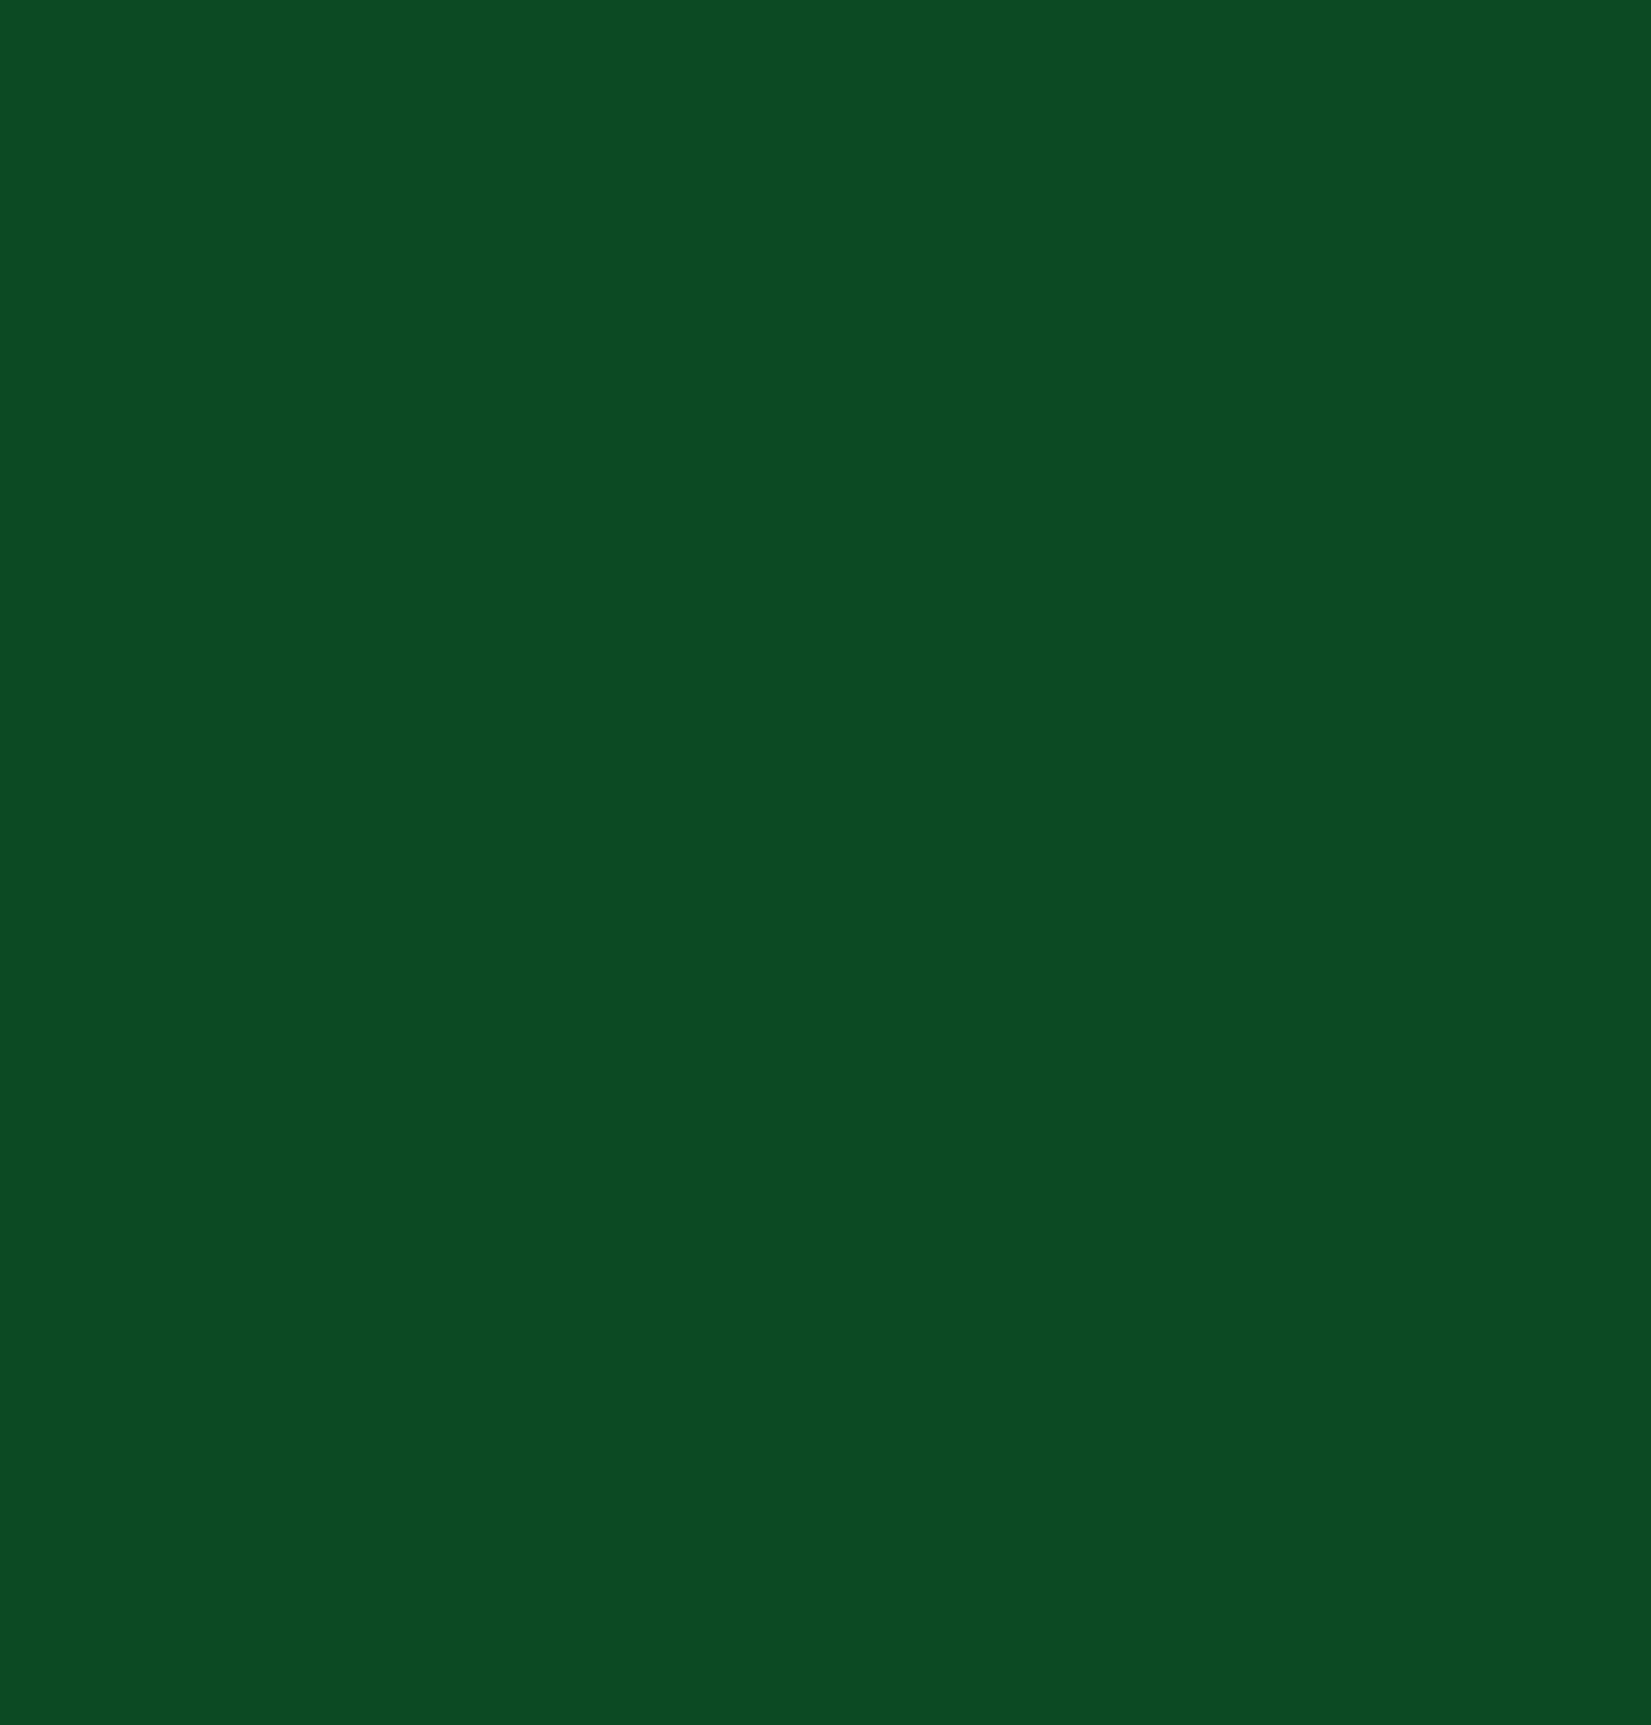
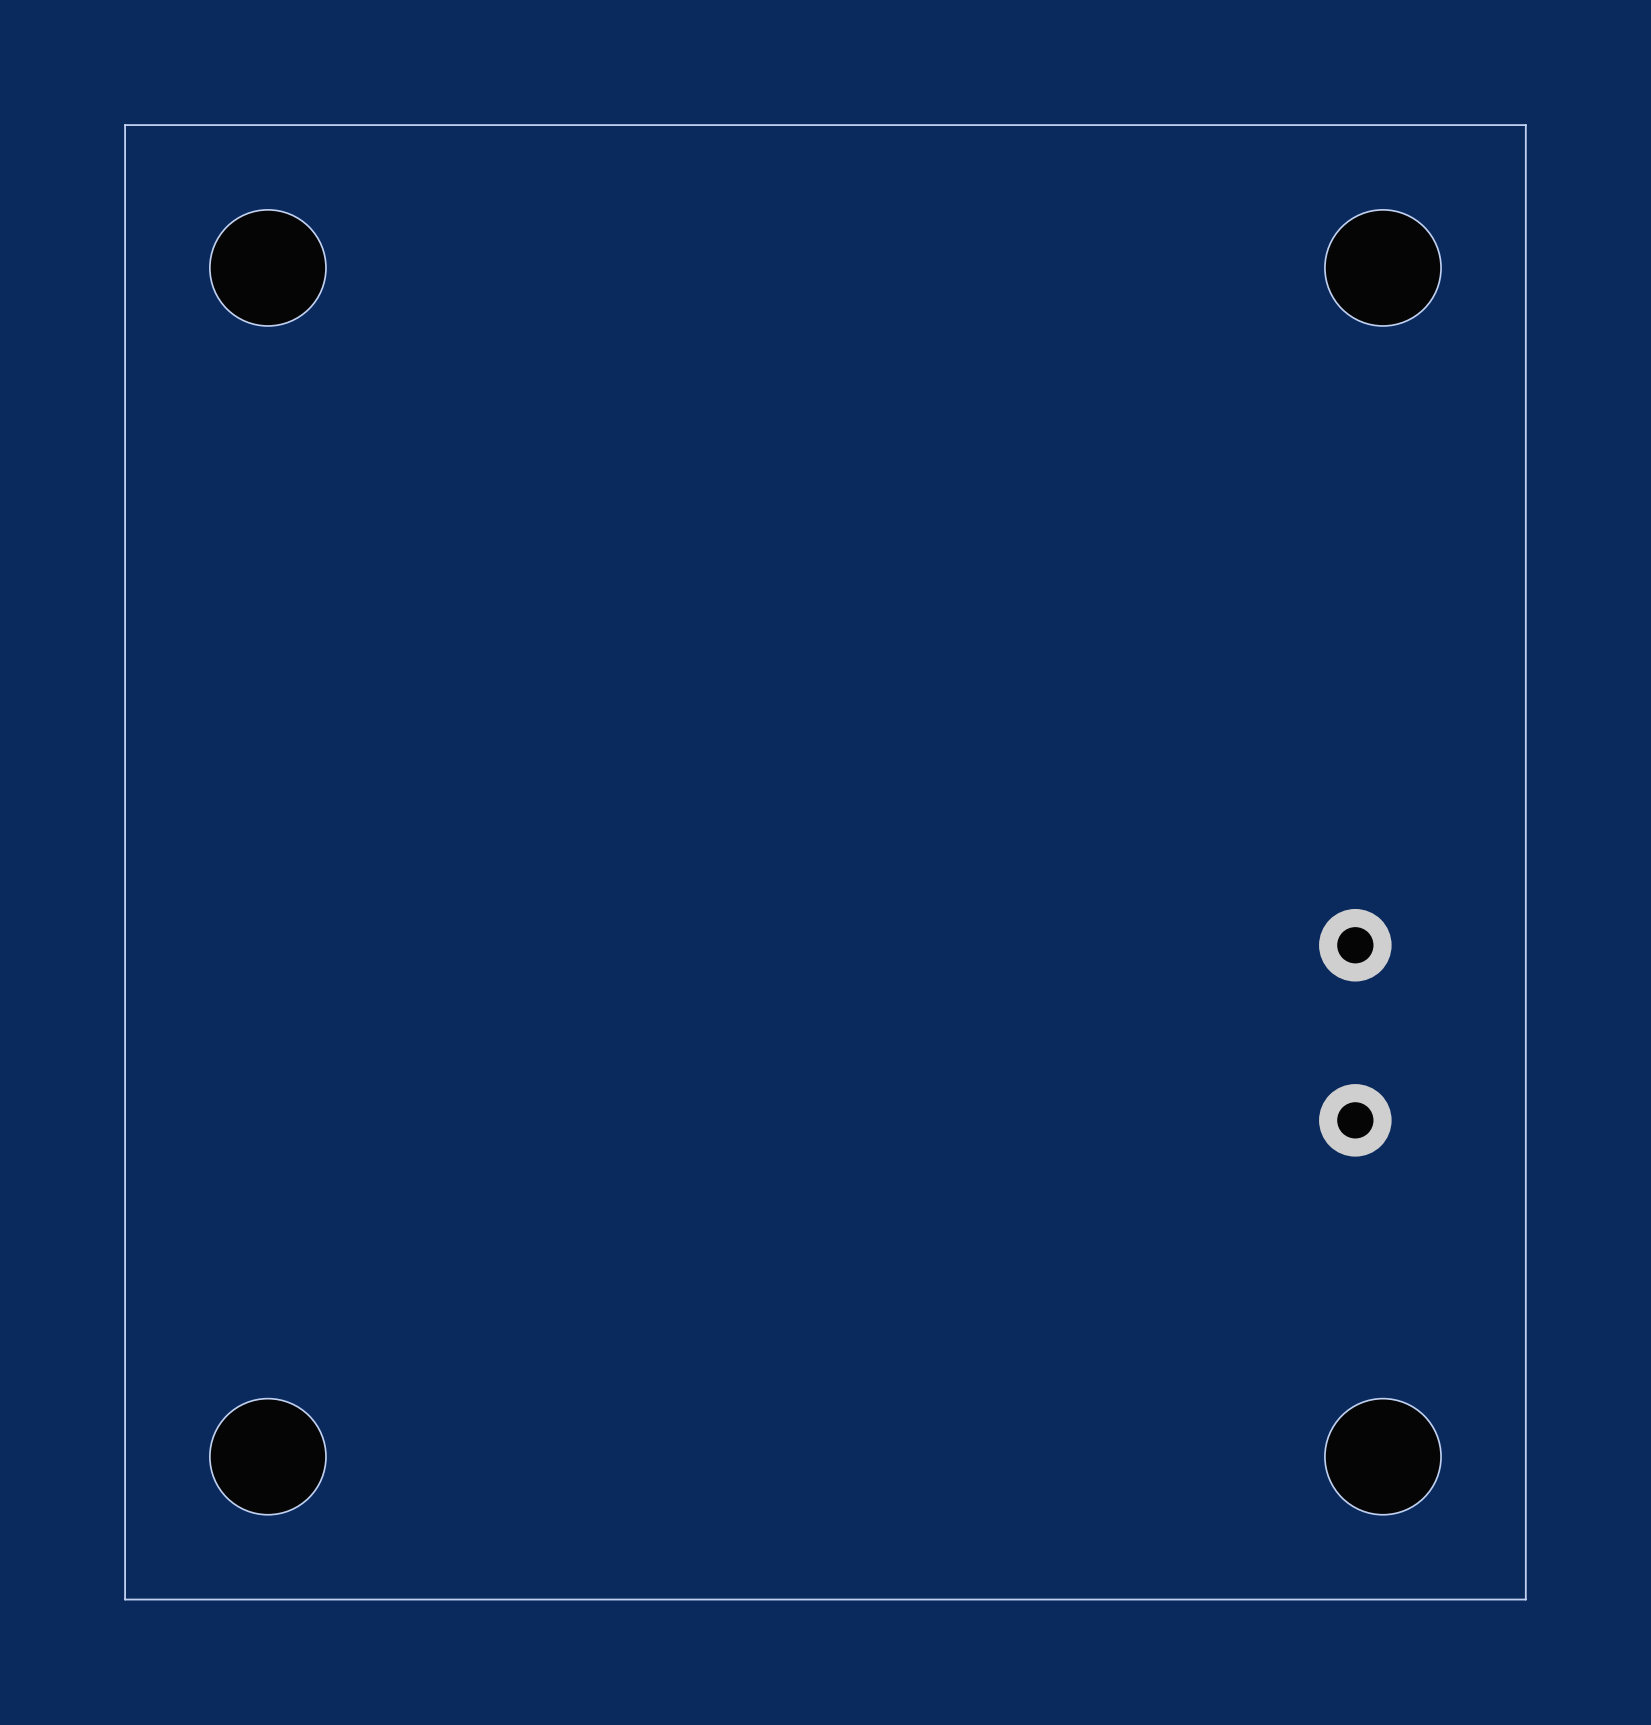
board edge: none -> (1525, 125) (125, 125) (125, 1599) (1525, 1599) (1525, 125)
part: none -> (267, 267)
part: none -> (1382, 267)
part: none -> (1355, 945)
part: none -> (1355, 1120)
part: none -> (267, 1456)
part: none -> (1382, 1456)

